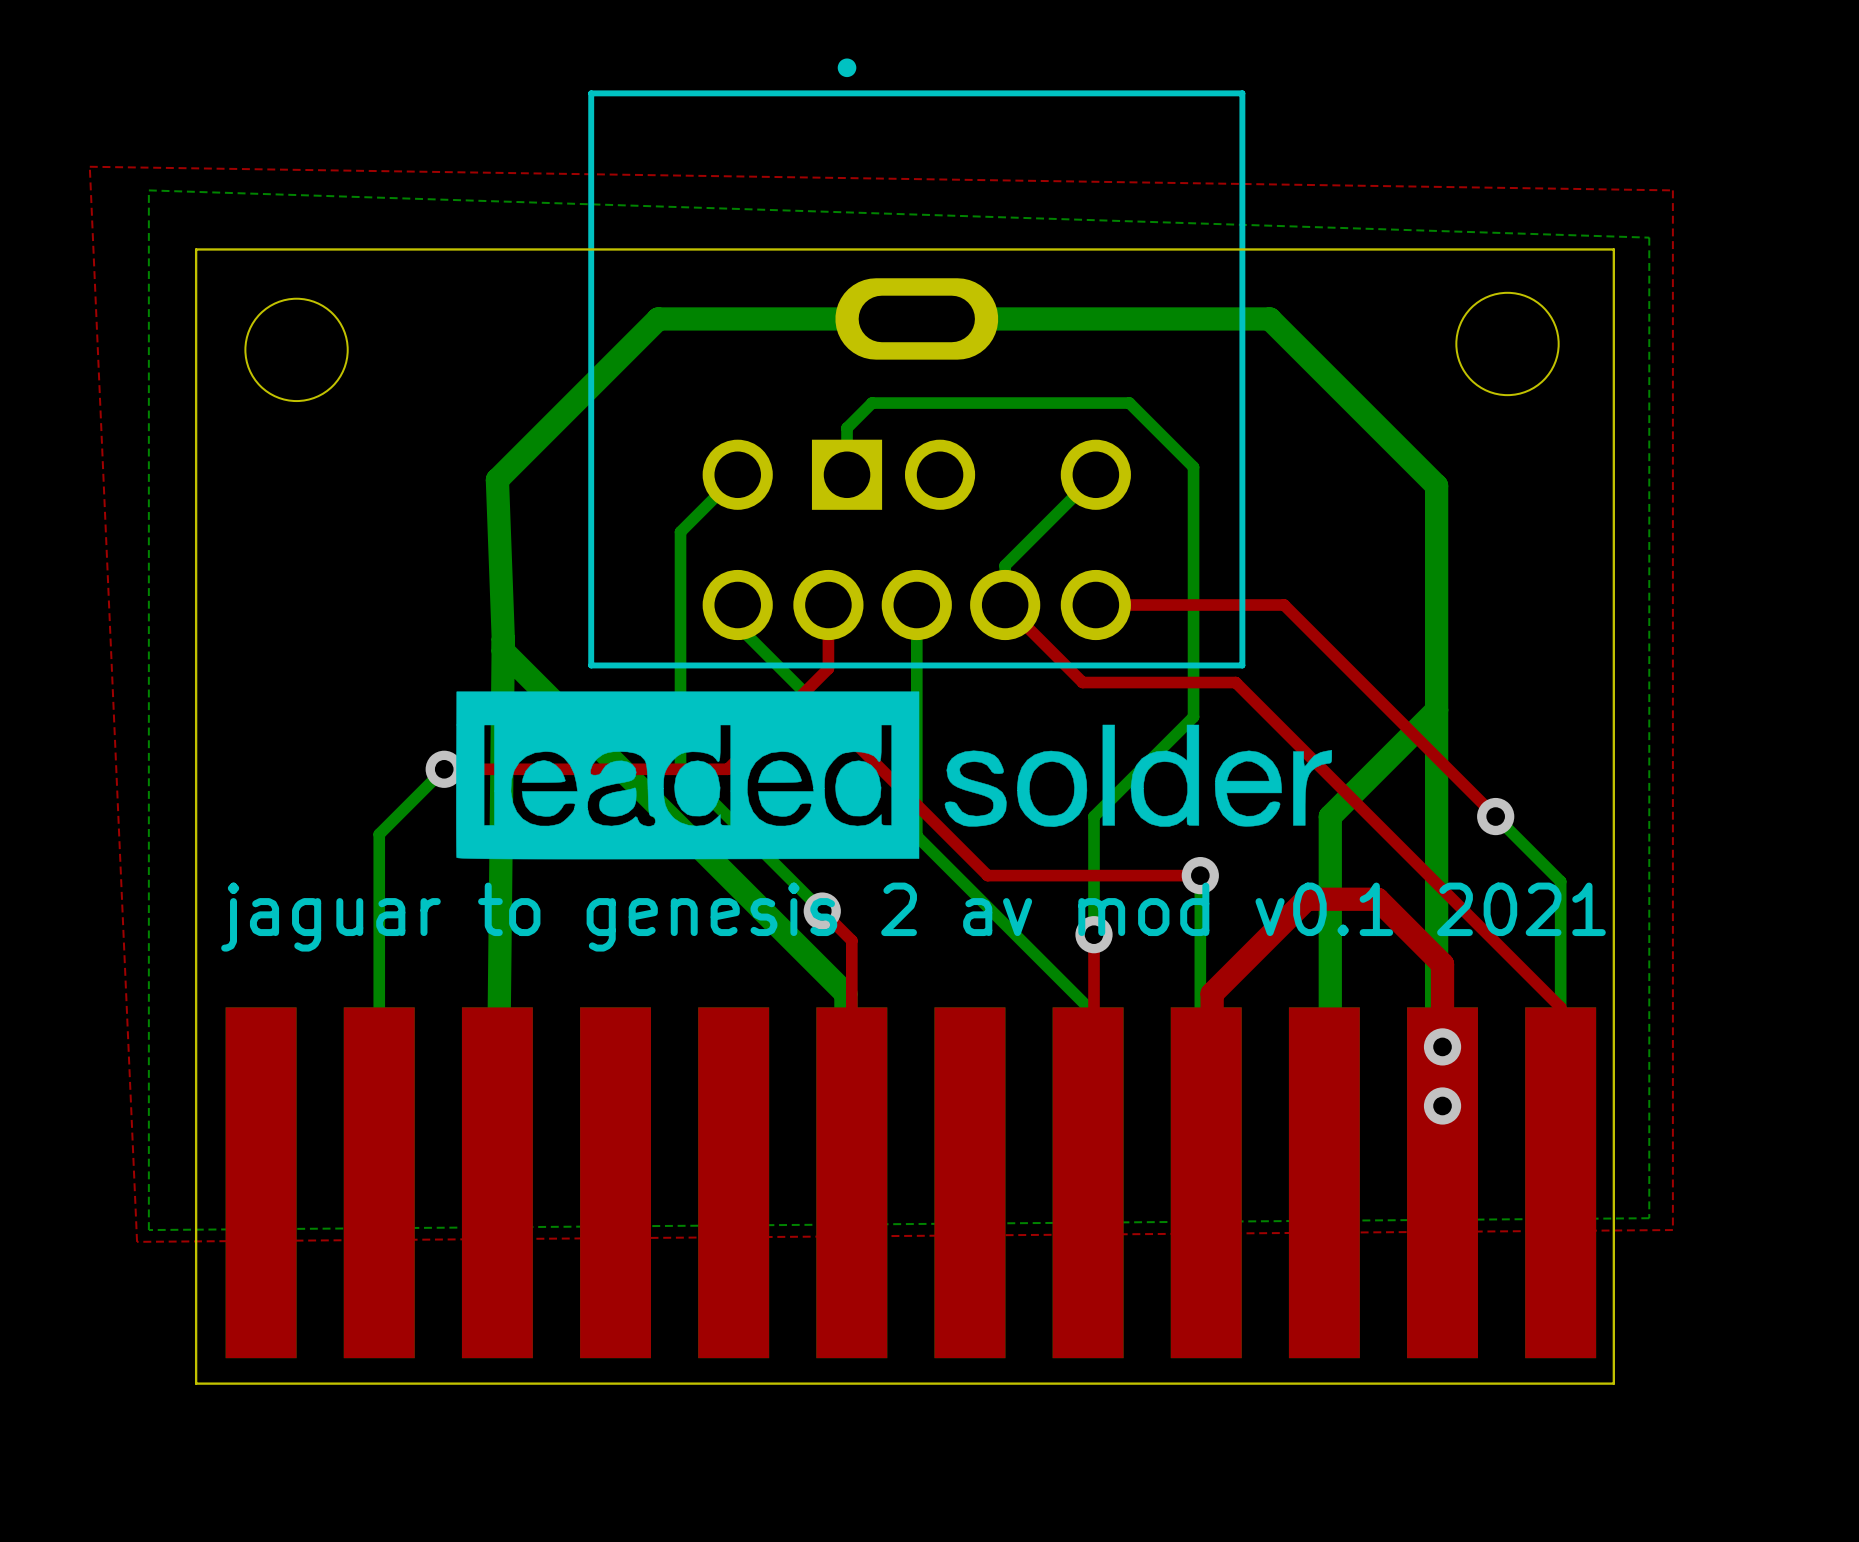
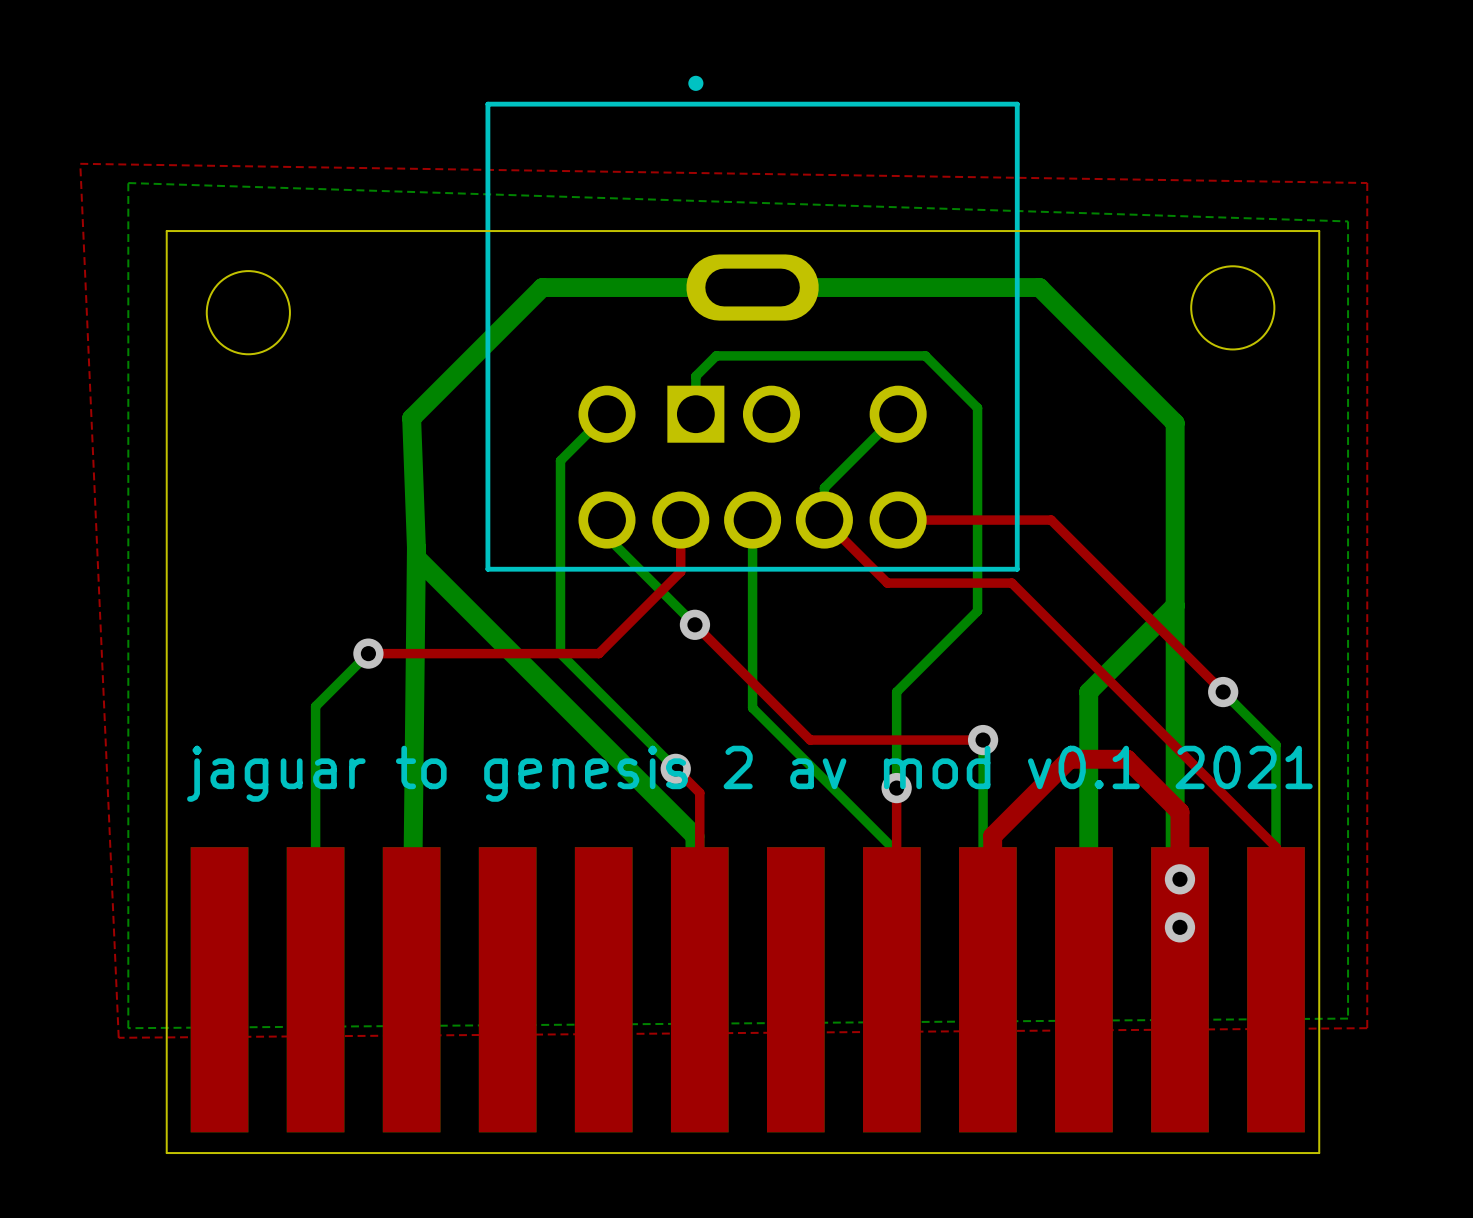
drawing: [456, 691, 1333, 860] -> none

